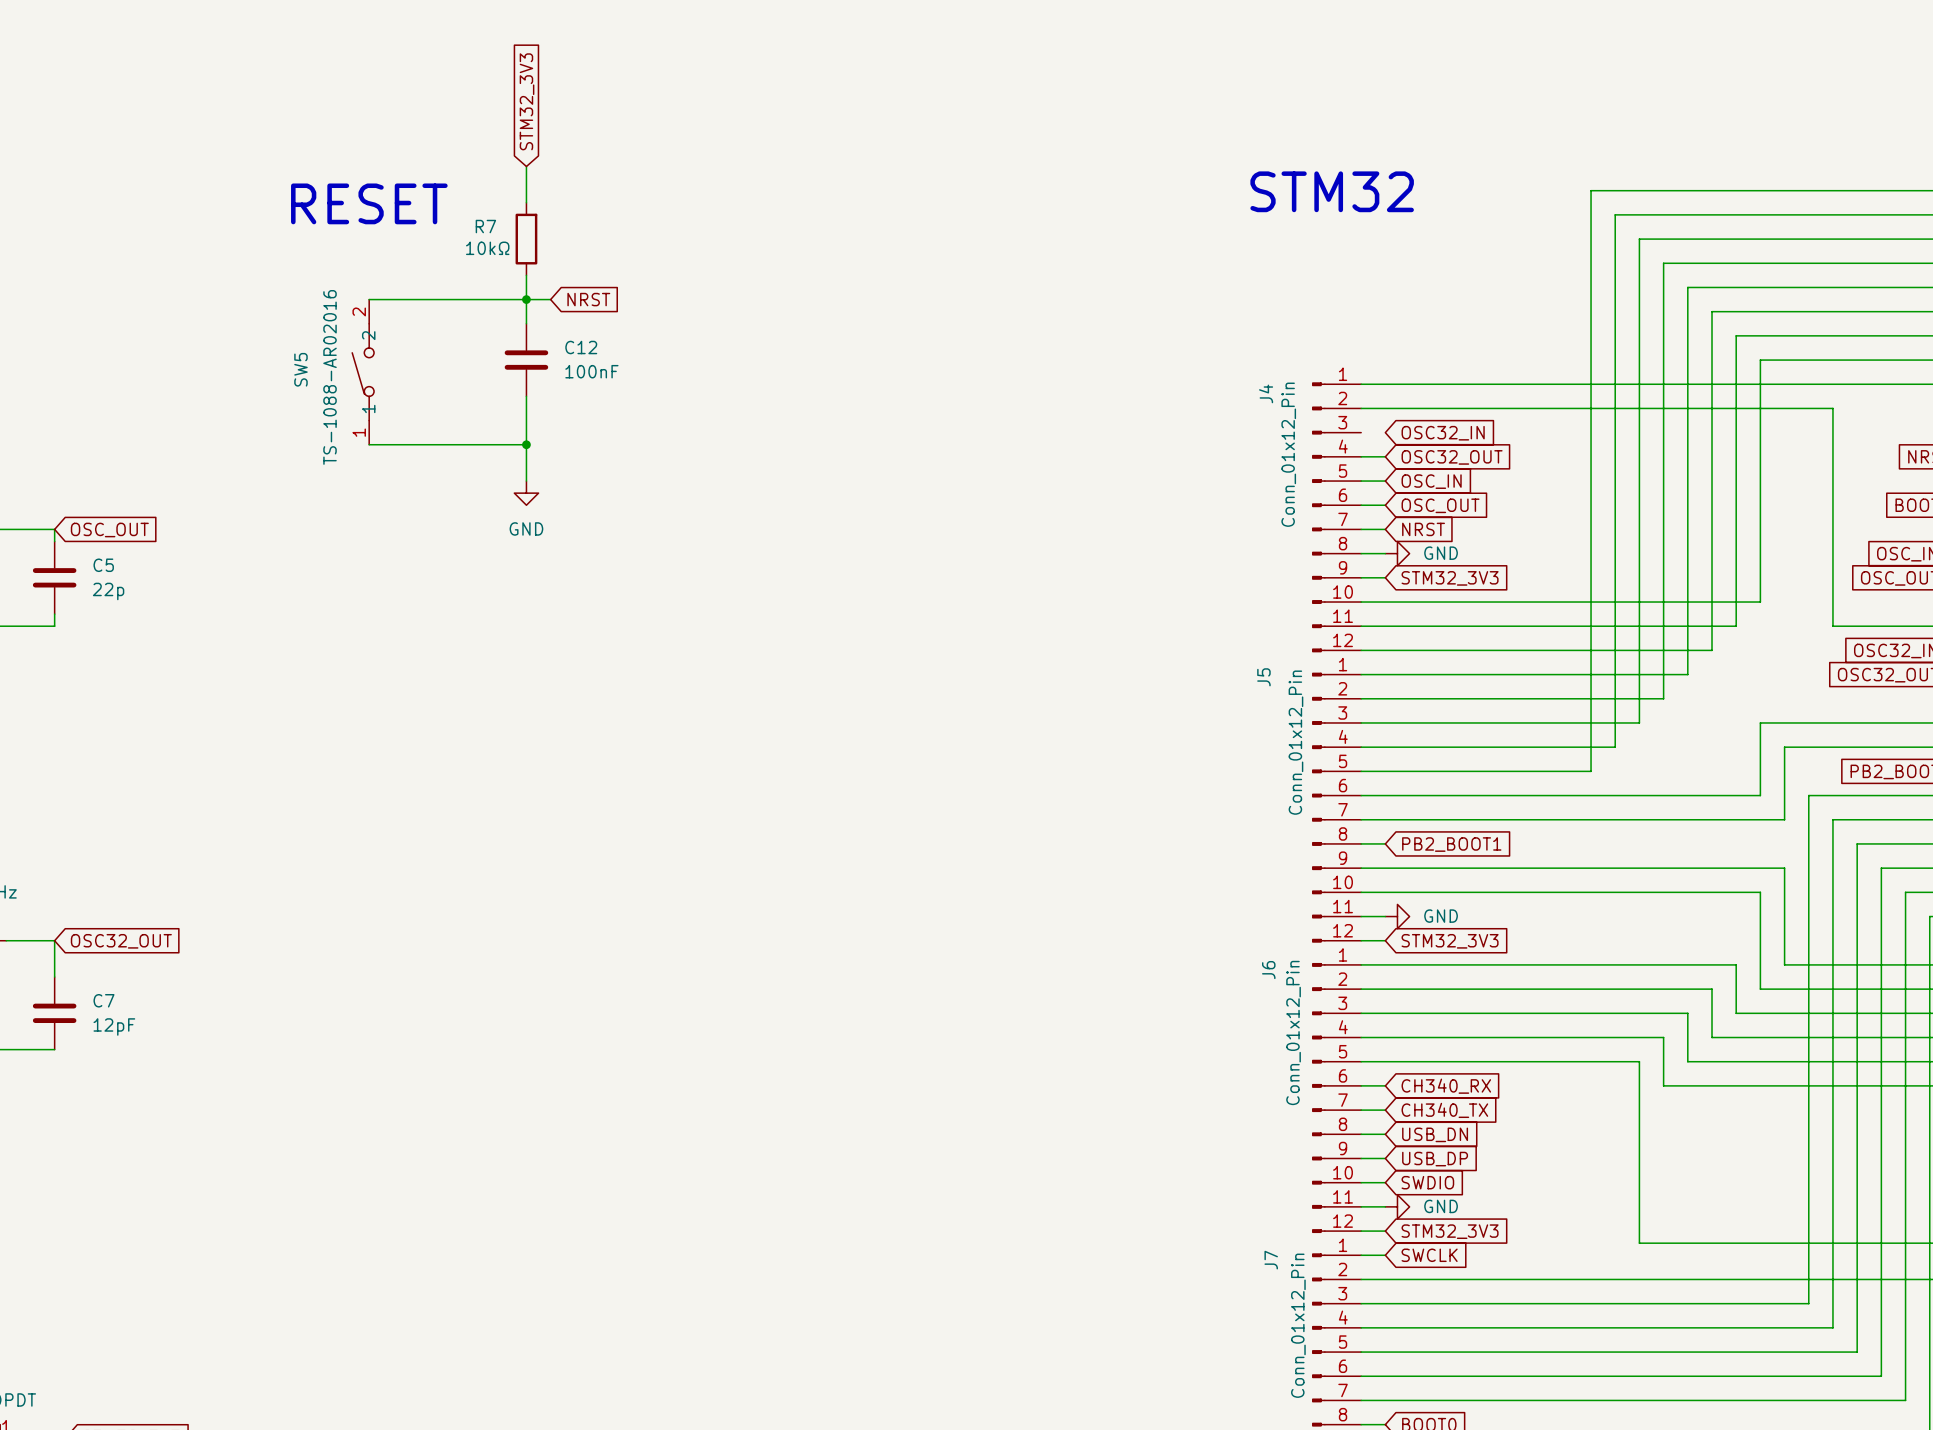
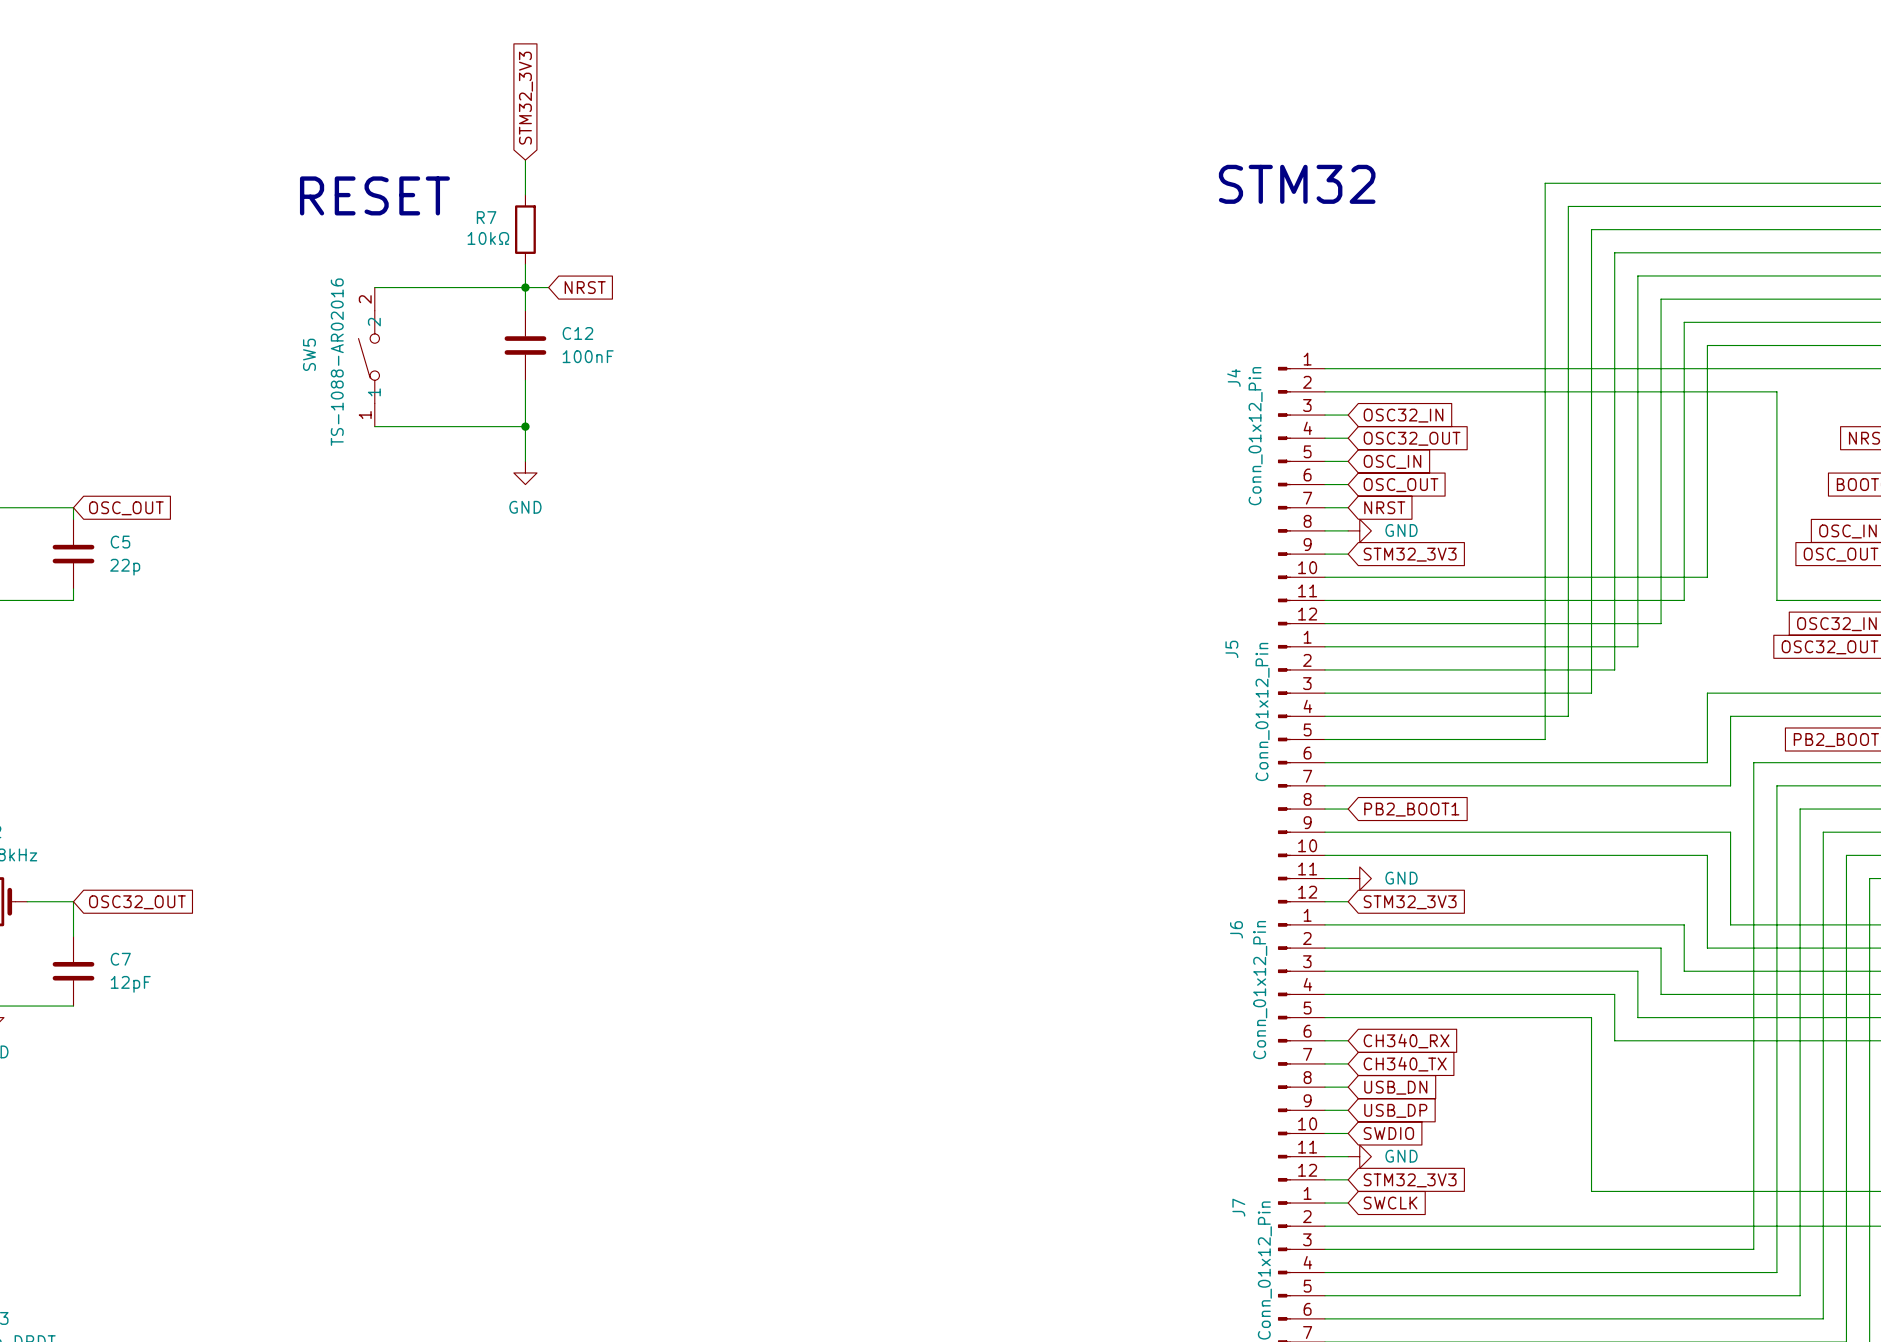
wire: none -> (1325, 415) (1348, 415)

